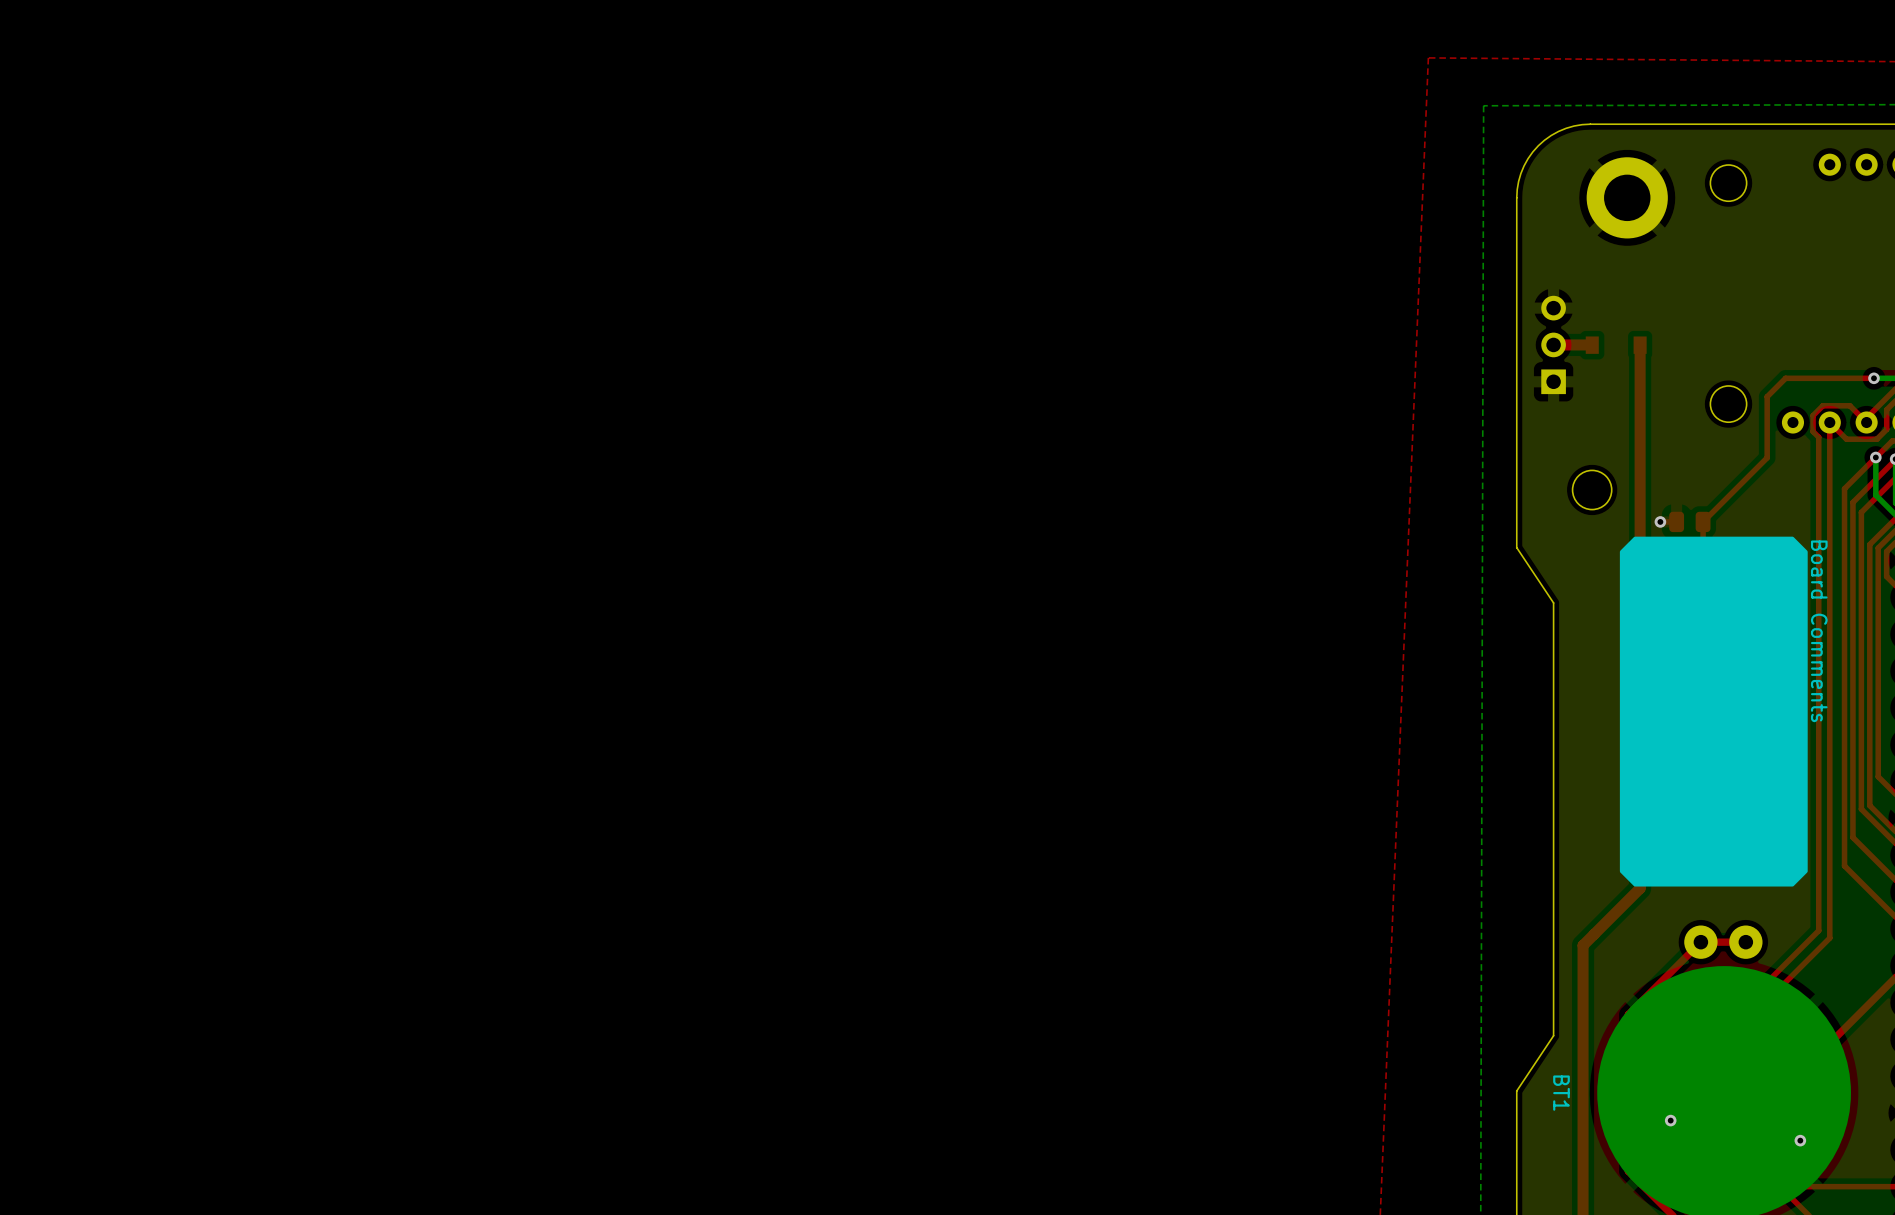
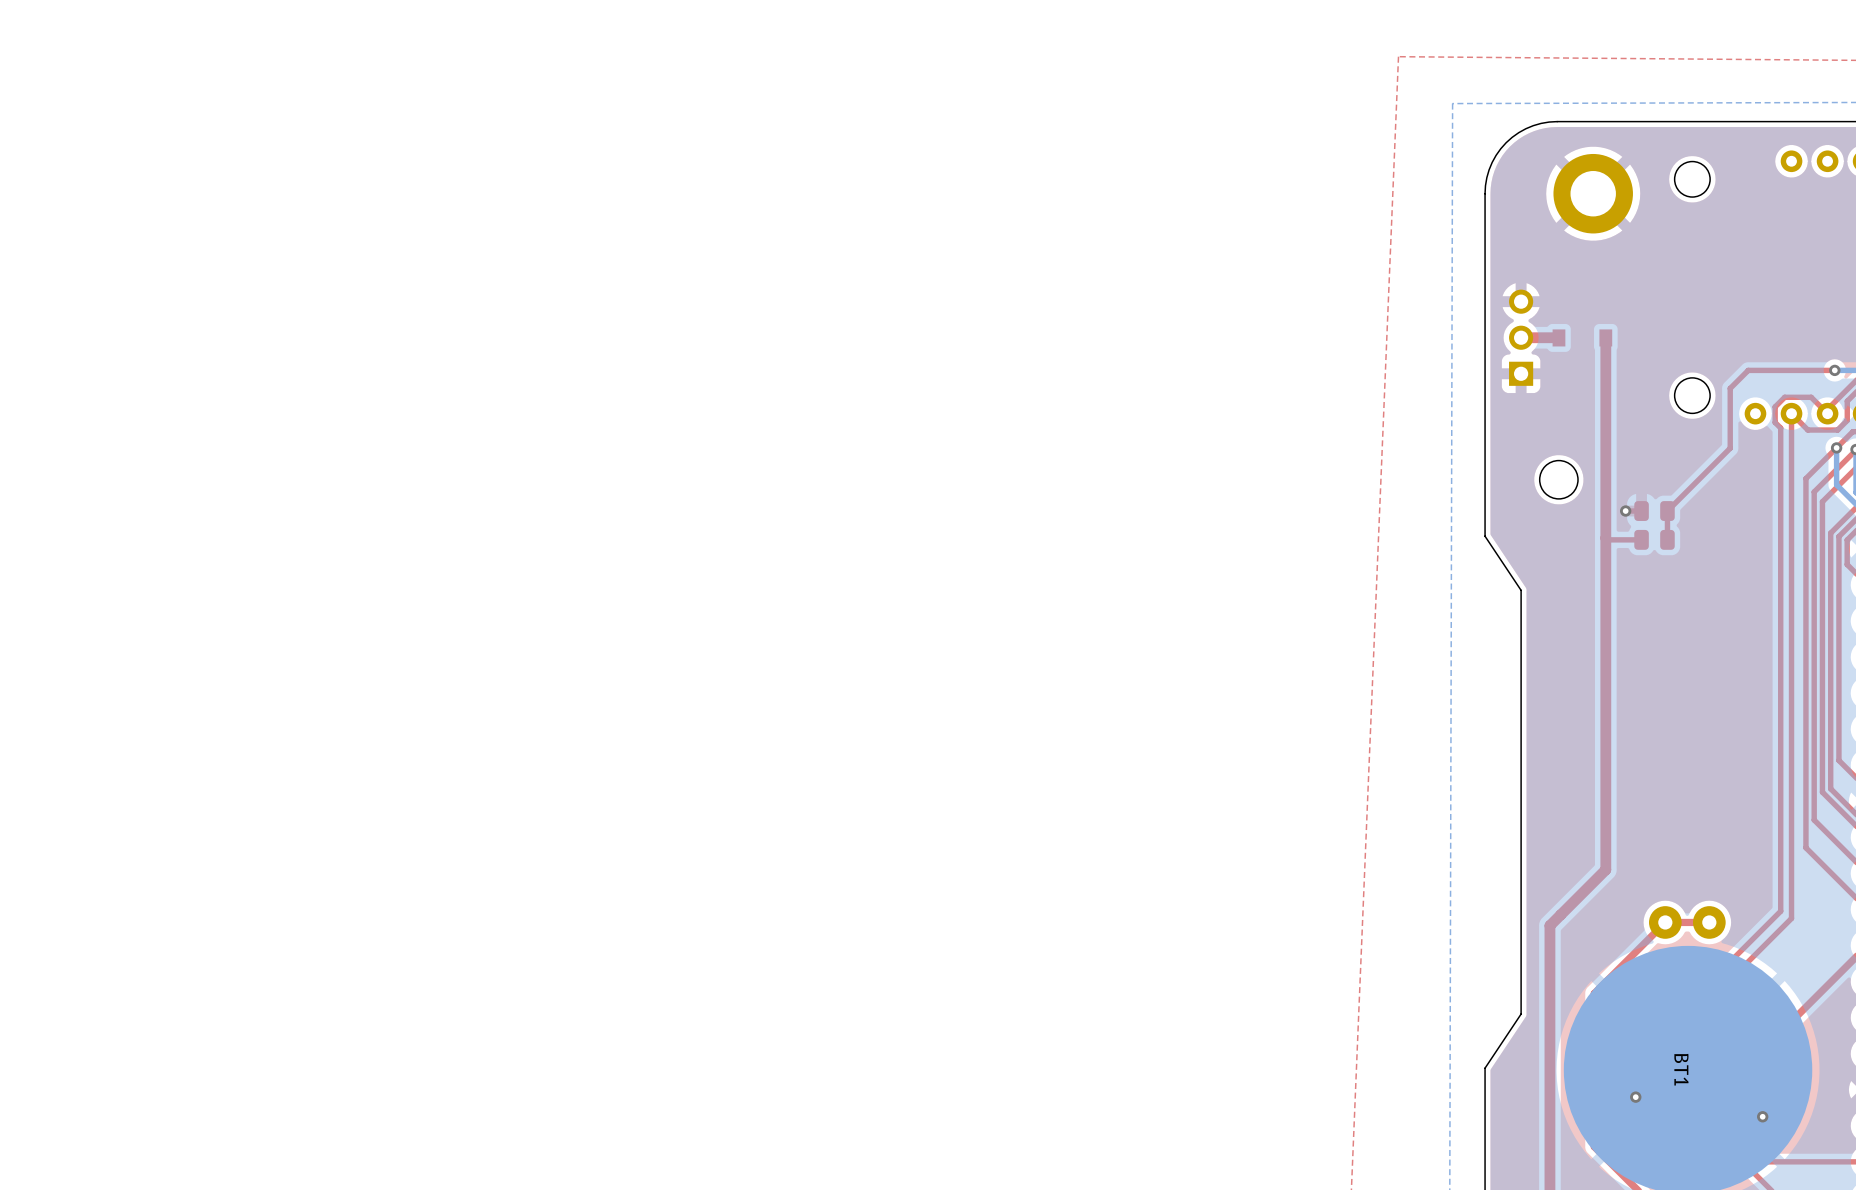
drawing: [1619, 536, 1808, 887] -> none
text: Board Comments (1819, 631) -> none
BT1 name position: BT1 (1561, 1093) -> BT1 (1681, 1069)

